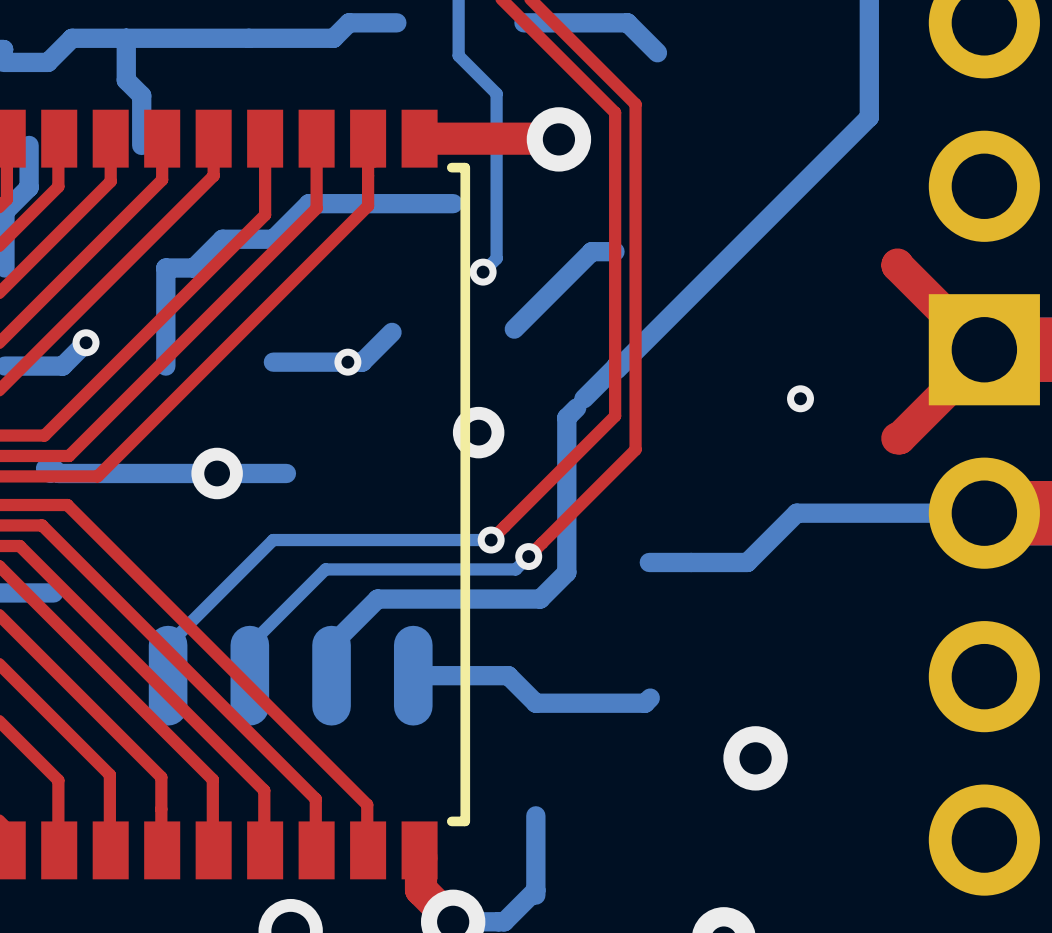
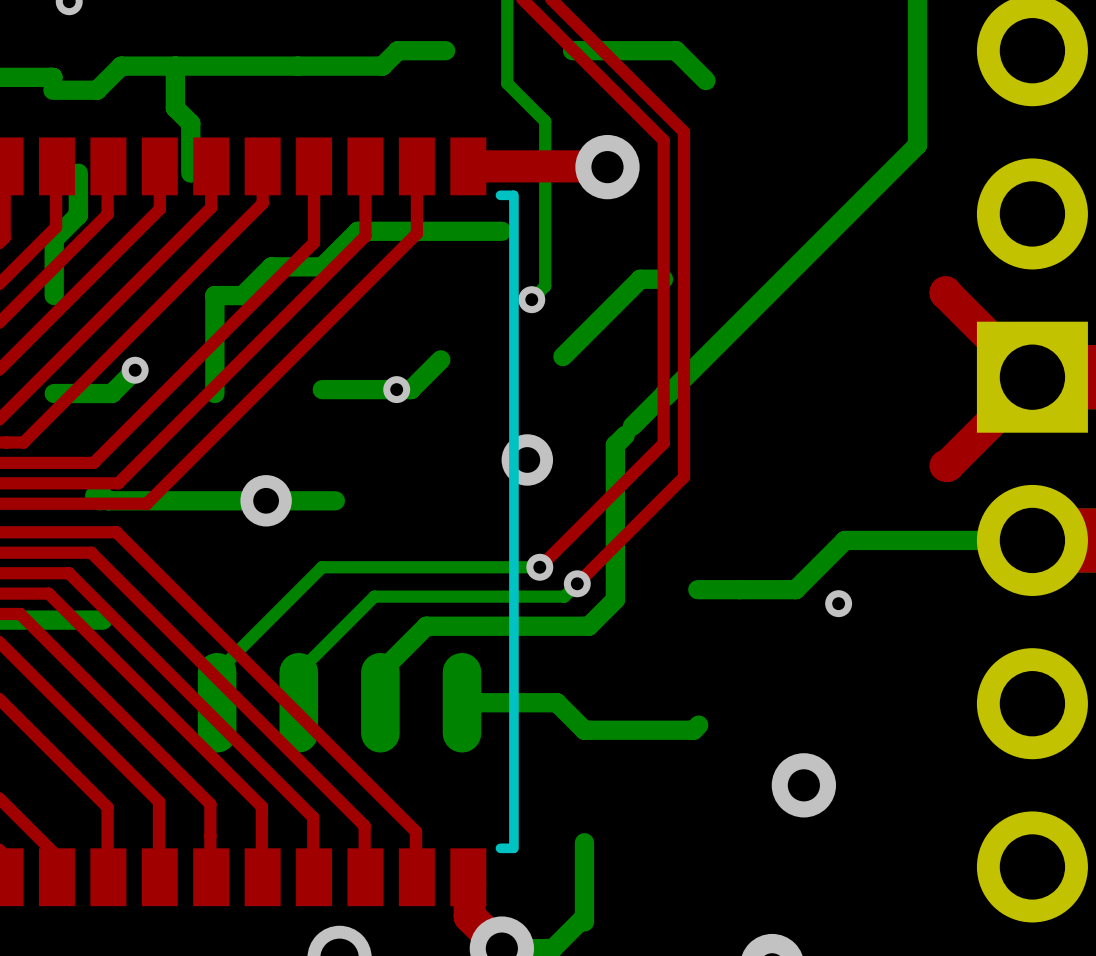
via position: (800, 398) -> (838, 603)

